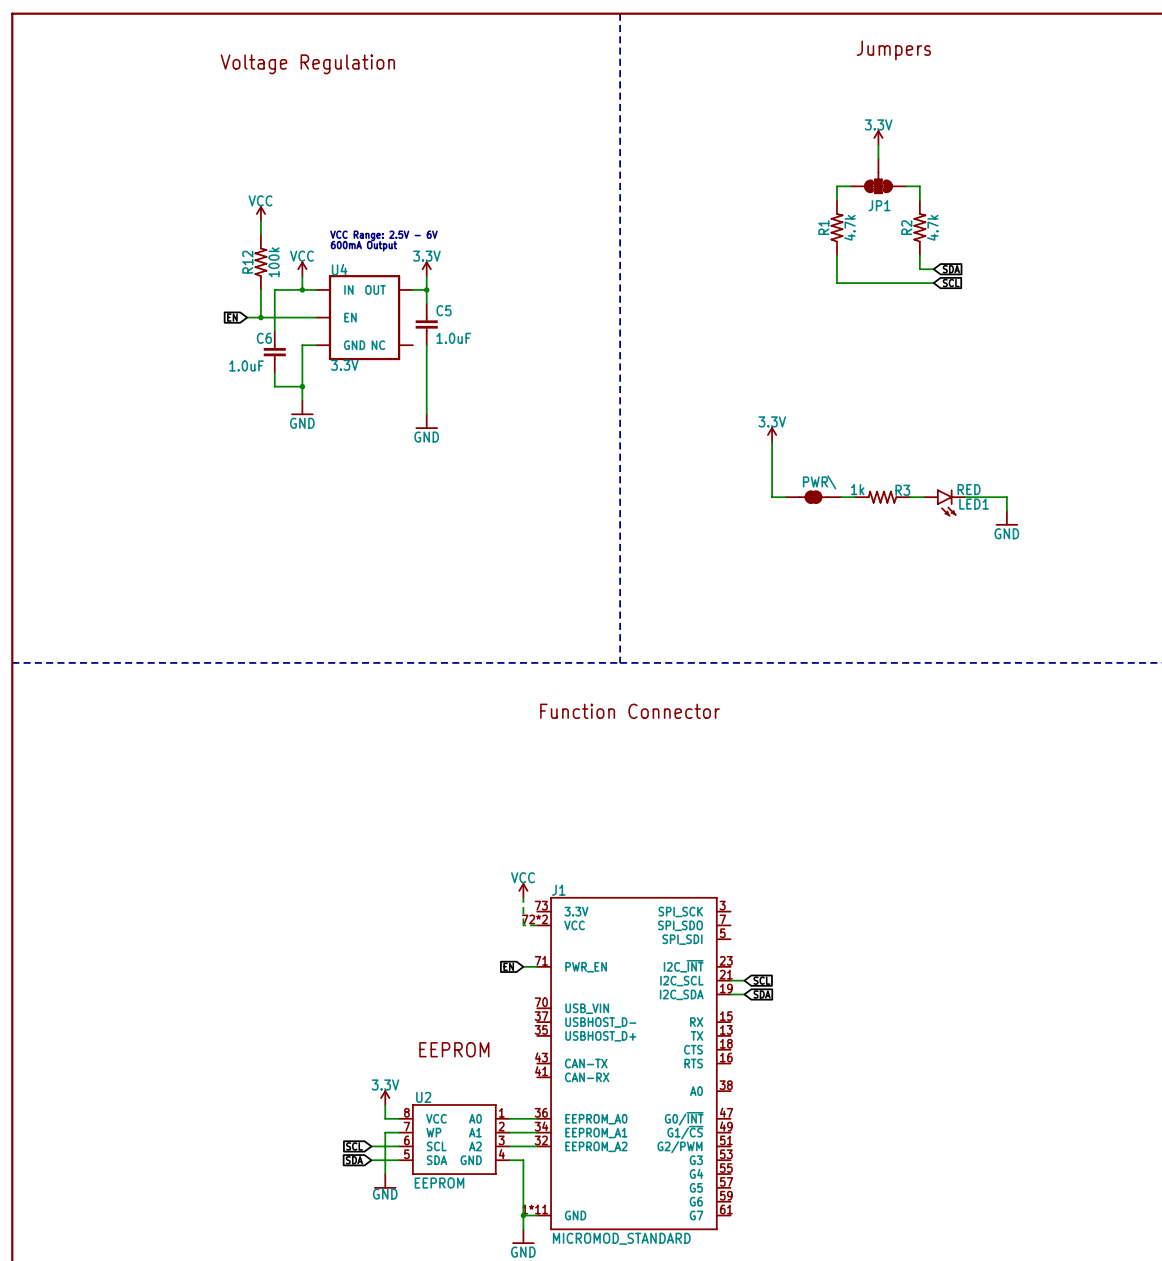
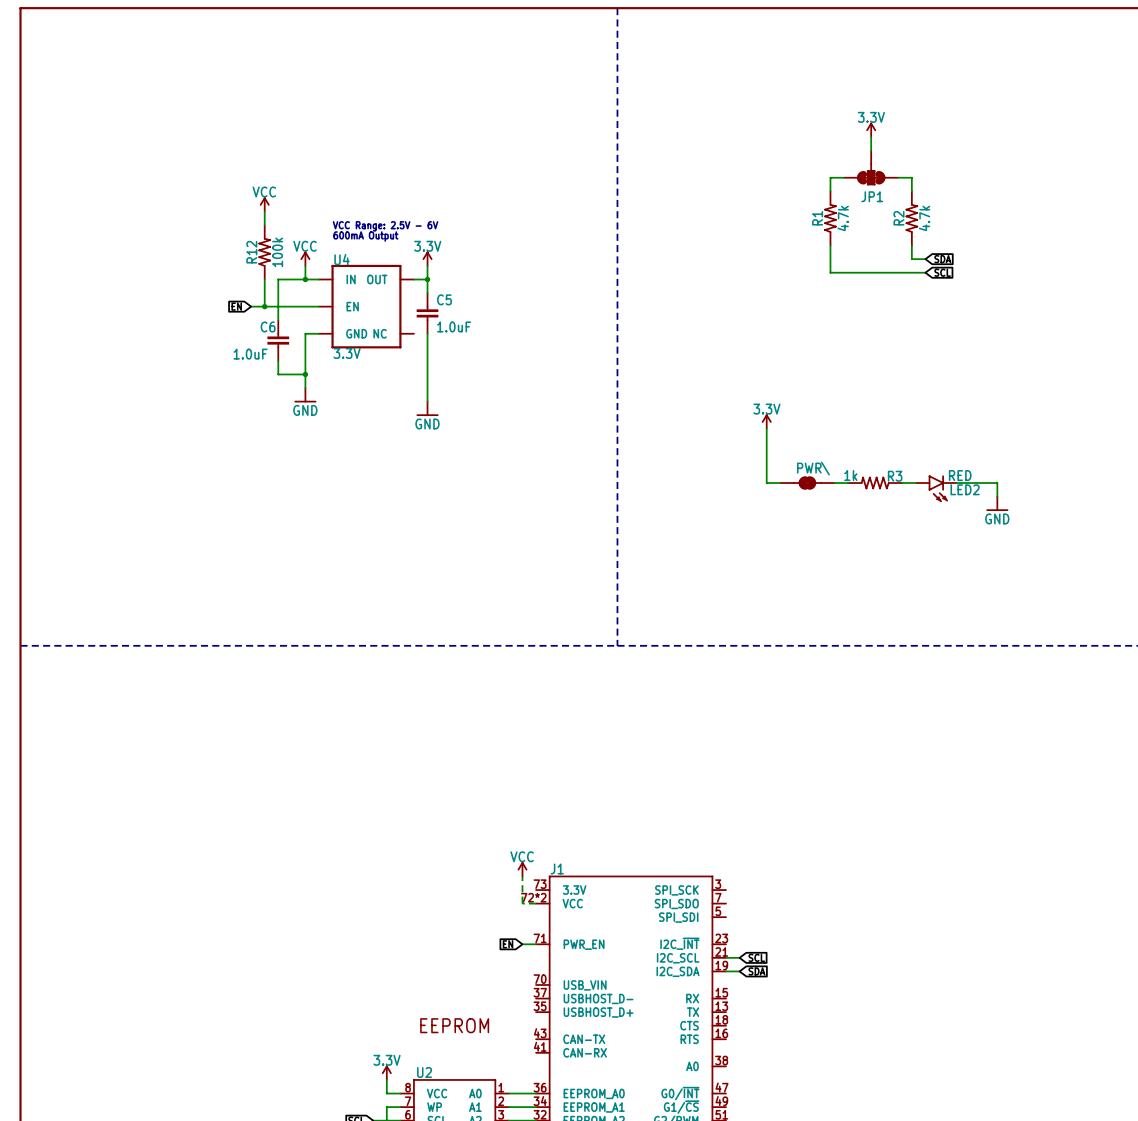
text: Jumpers (893, 50) -> none
text: Voltage Regulation (307, 64) -> none
LED1 name: LED1 (974, 504) -> LED2 (965, 489)
text: Function Connector (630, 711) -> none

